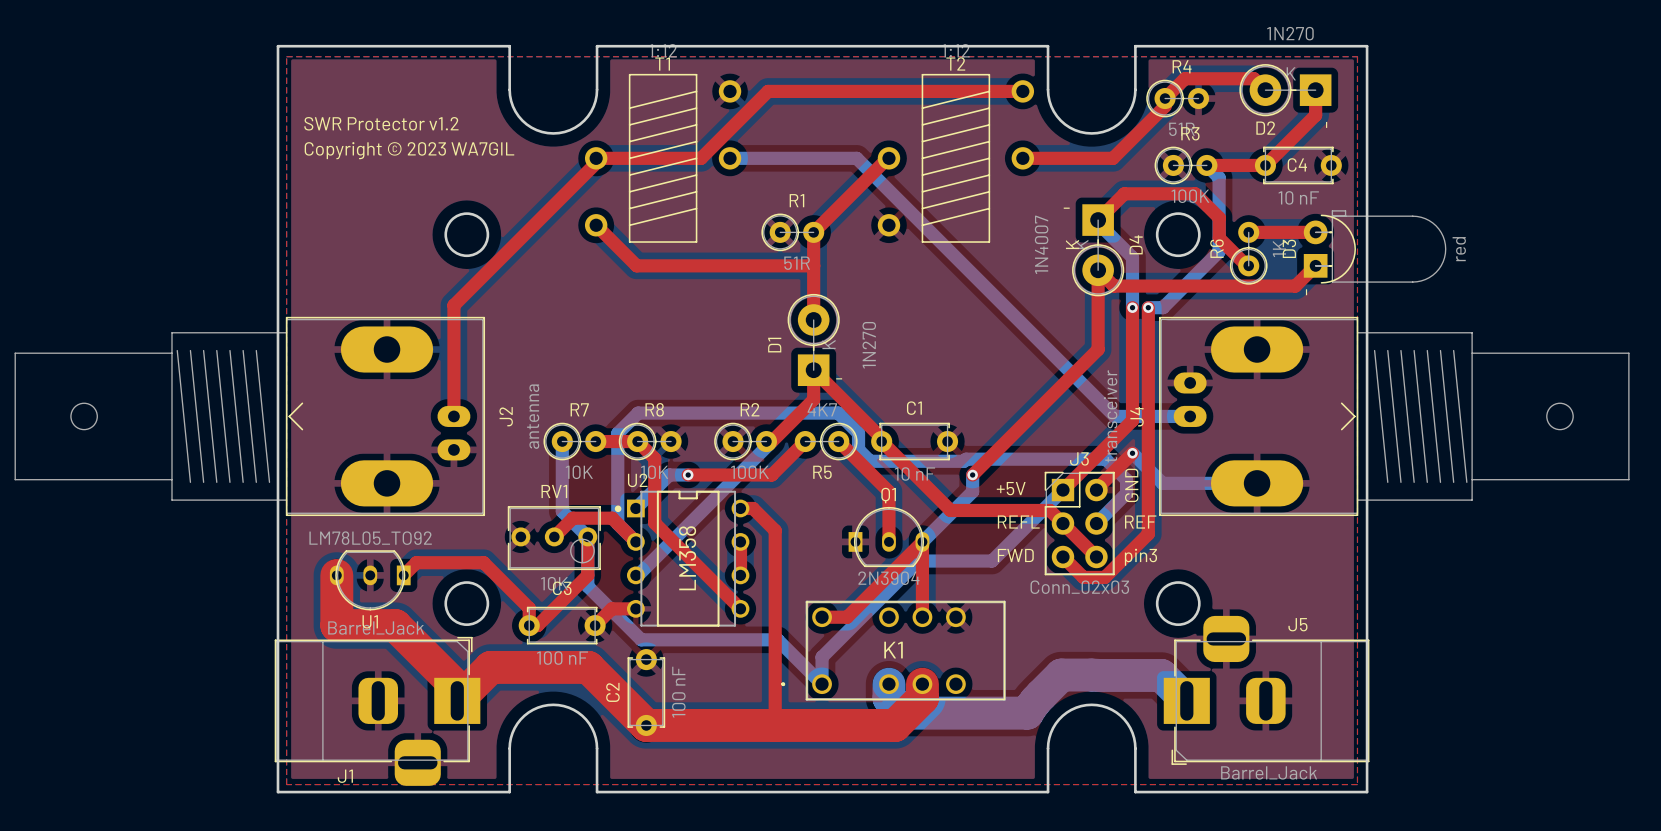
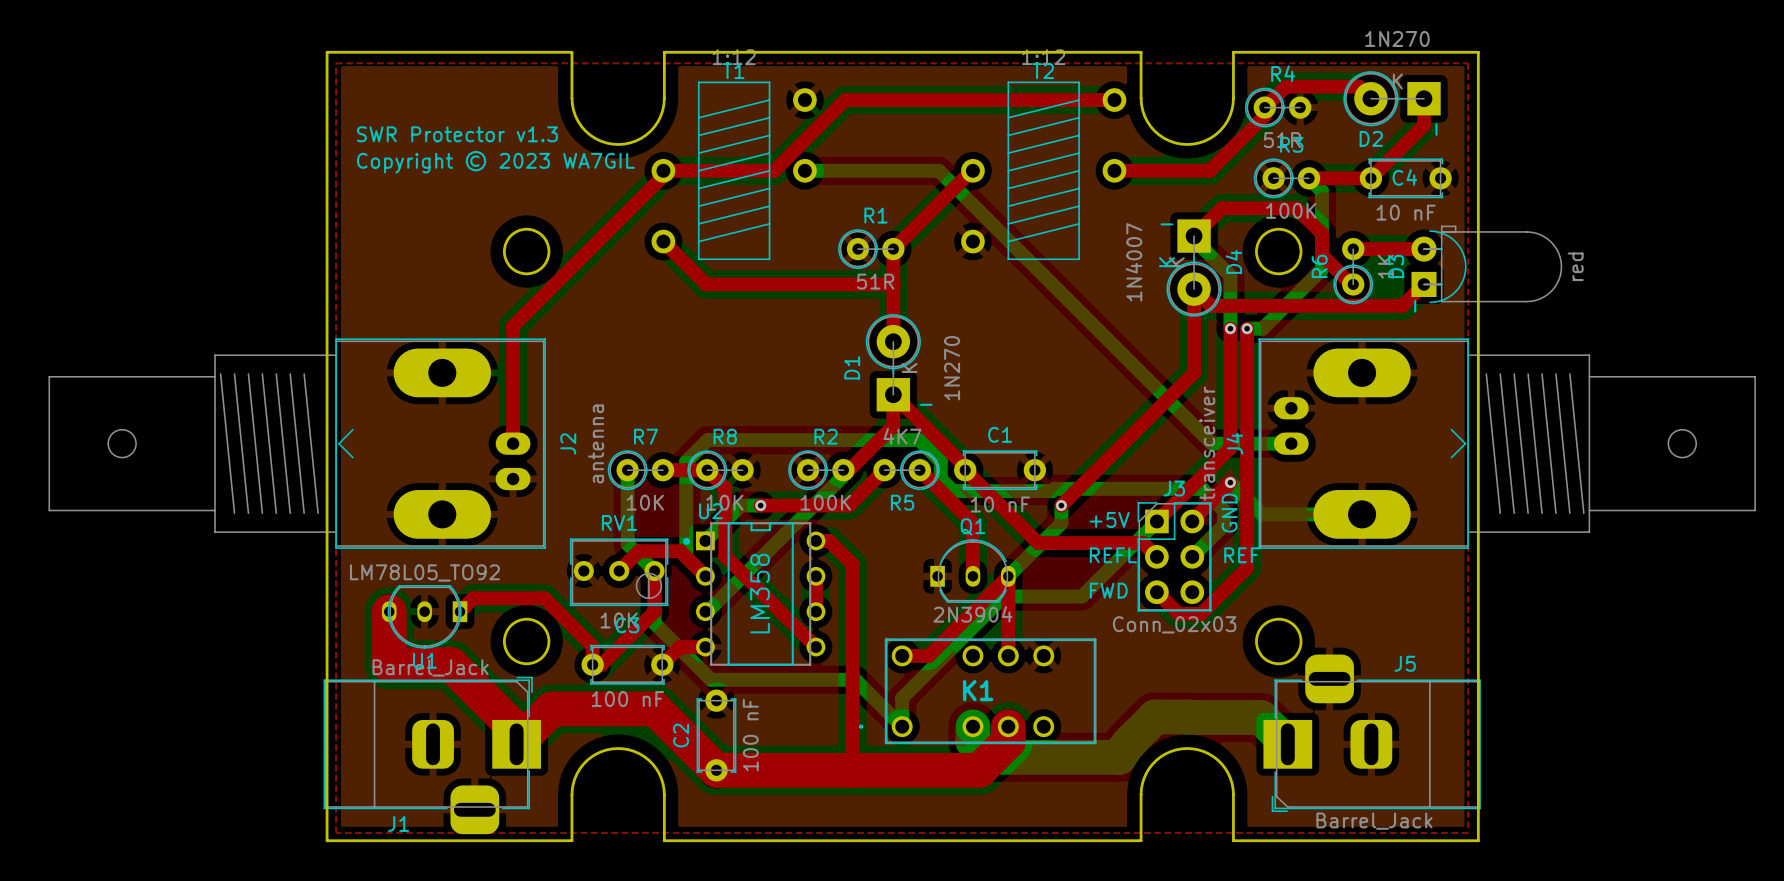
text: SWR Protector v1.2 (381, 123) -> SWR Protector v1.3 (457, 134)
Q1 footprint: [848, 506, 930, 568] -> [930, 539, 1016, 603]
top track: (1062, 523) (1096, 556) -> none
text: pin3 (1140, 557) -> none

